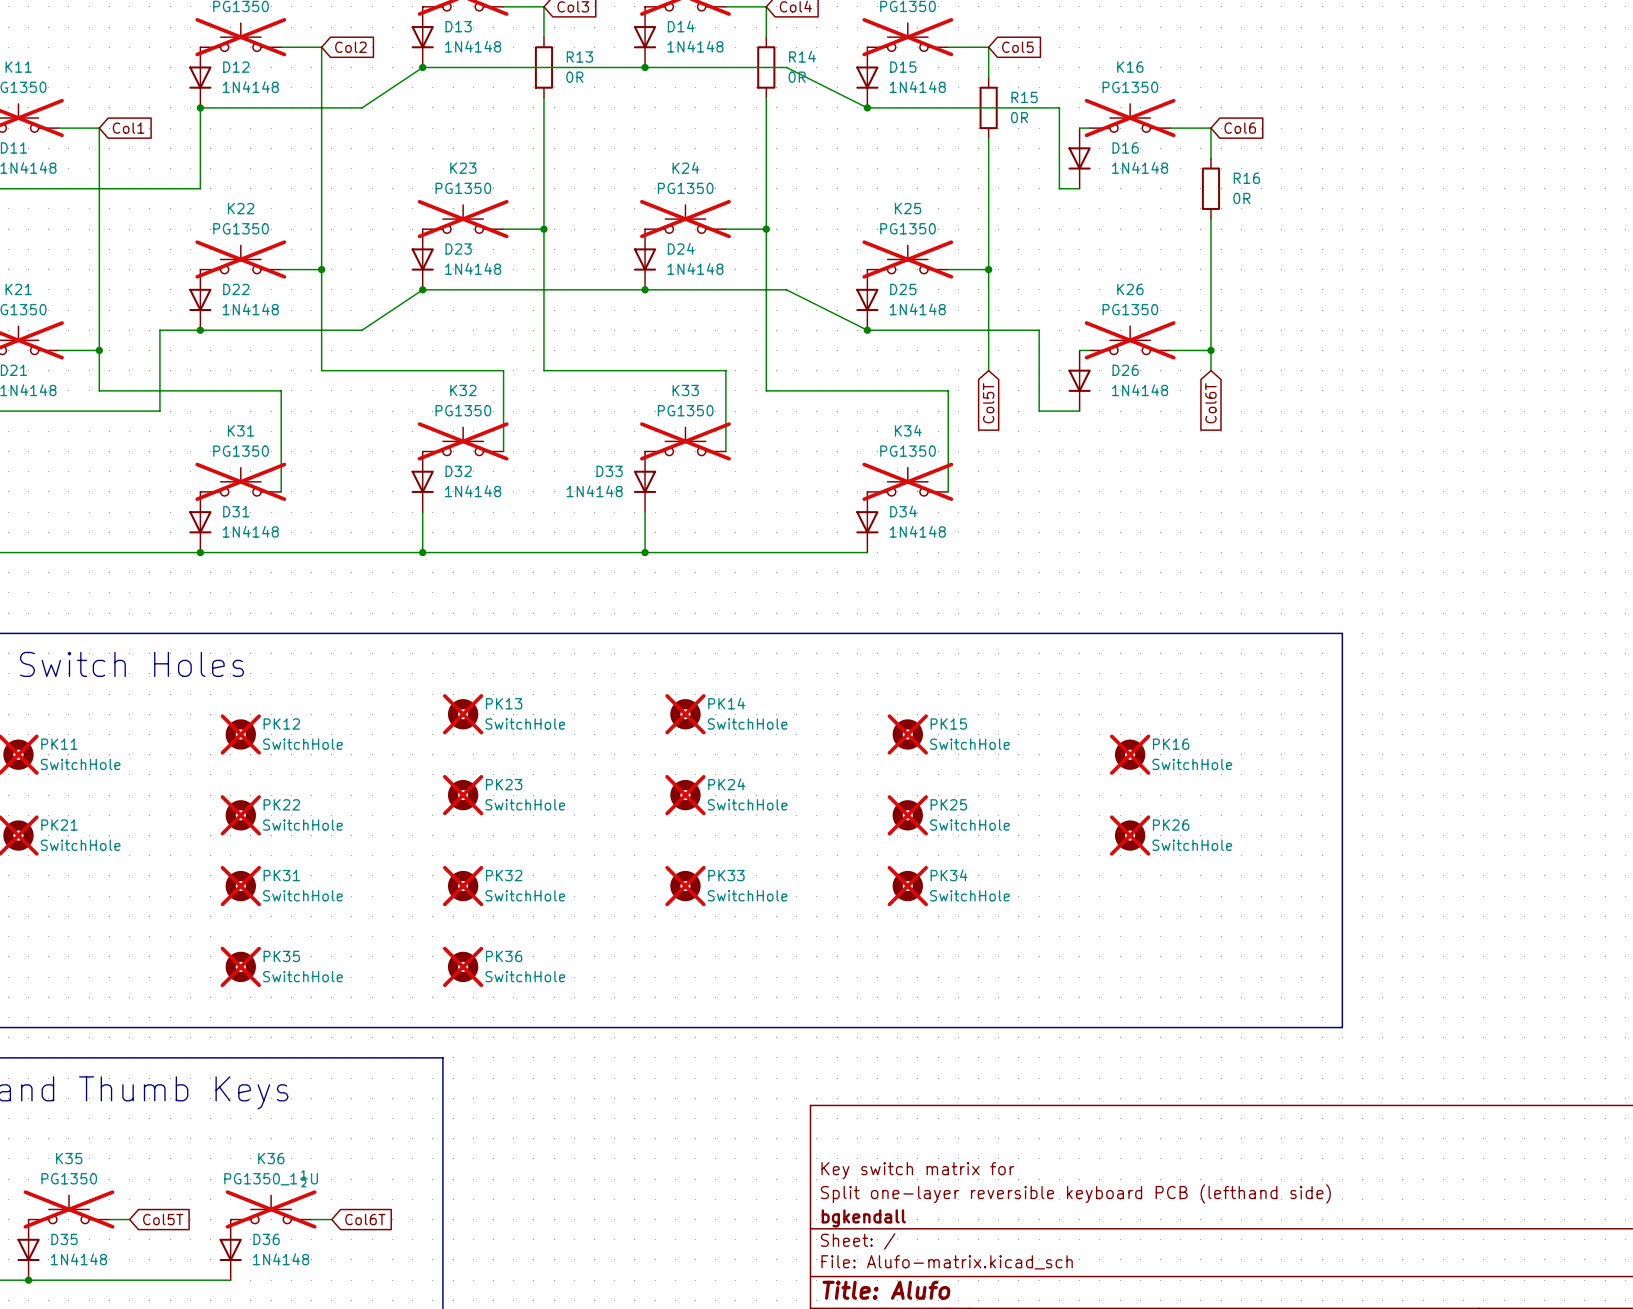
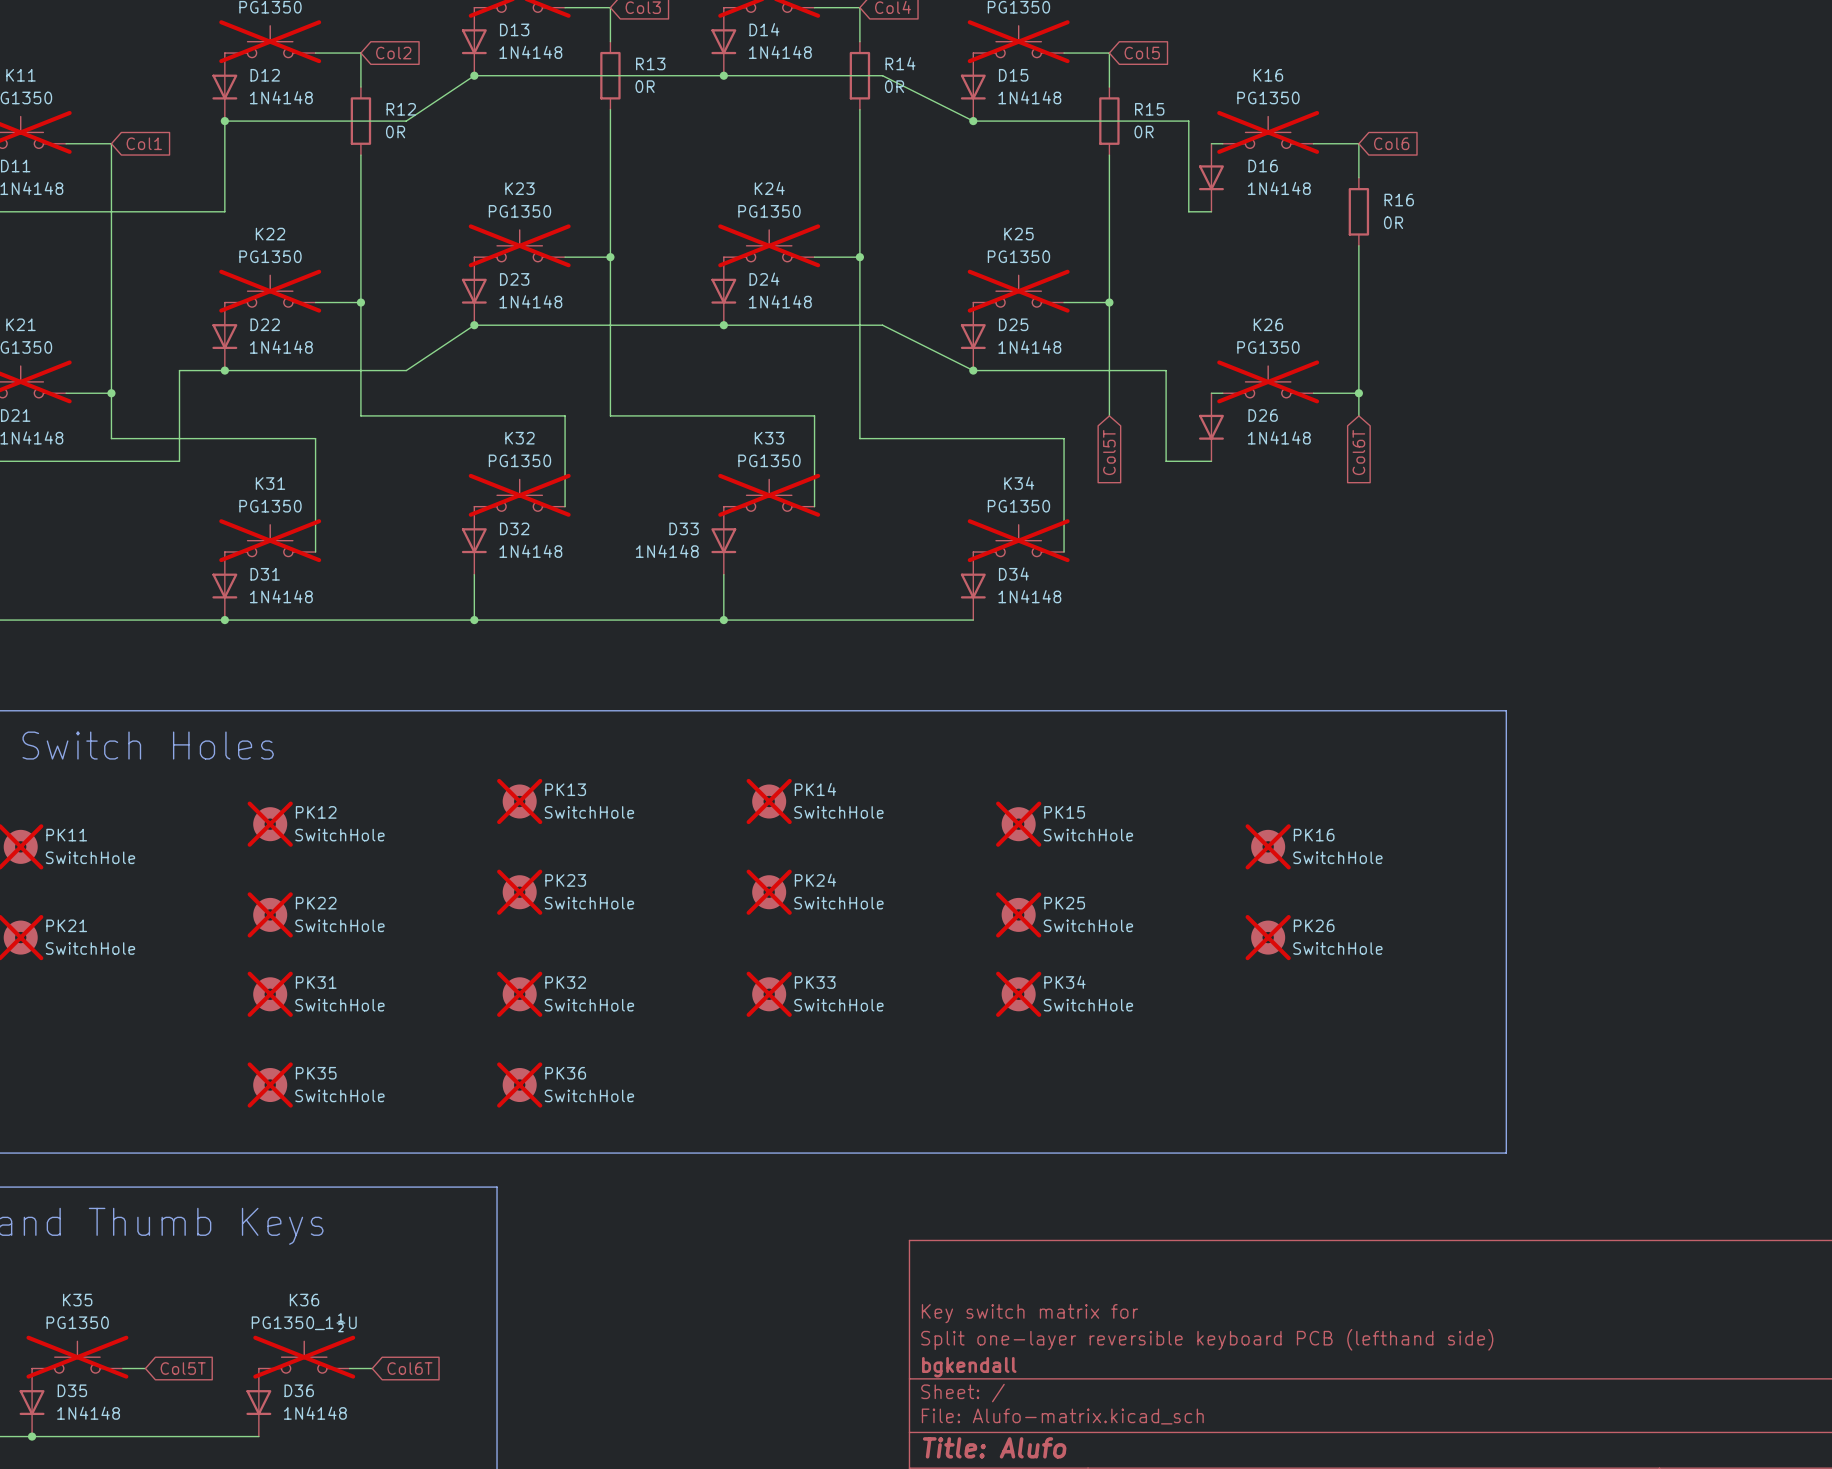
wire: (321, 77) (321, 138) -> none
R12: none -> 0R (360, 121)

